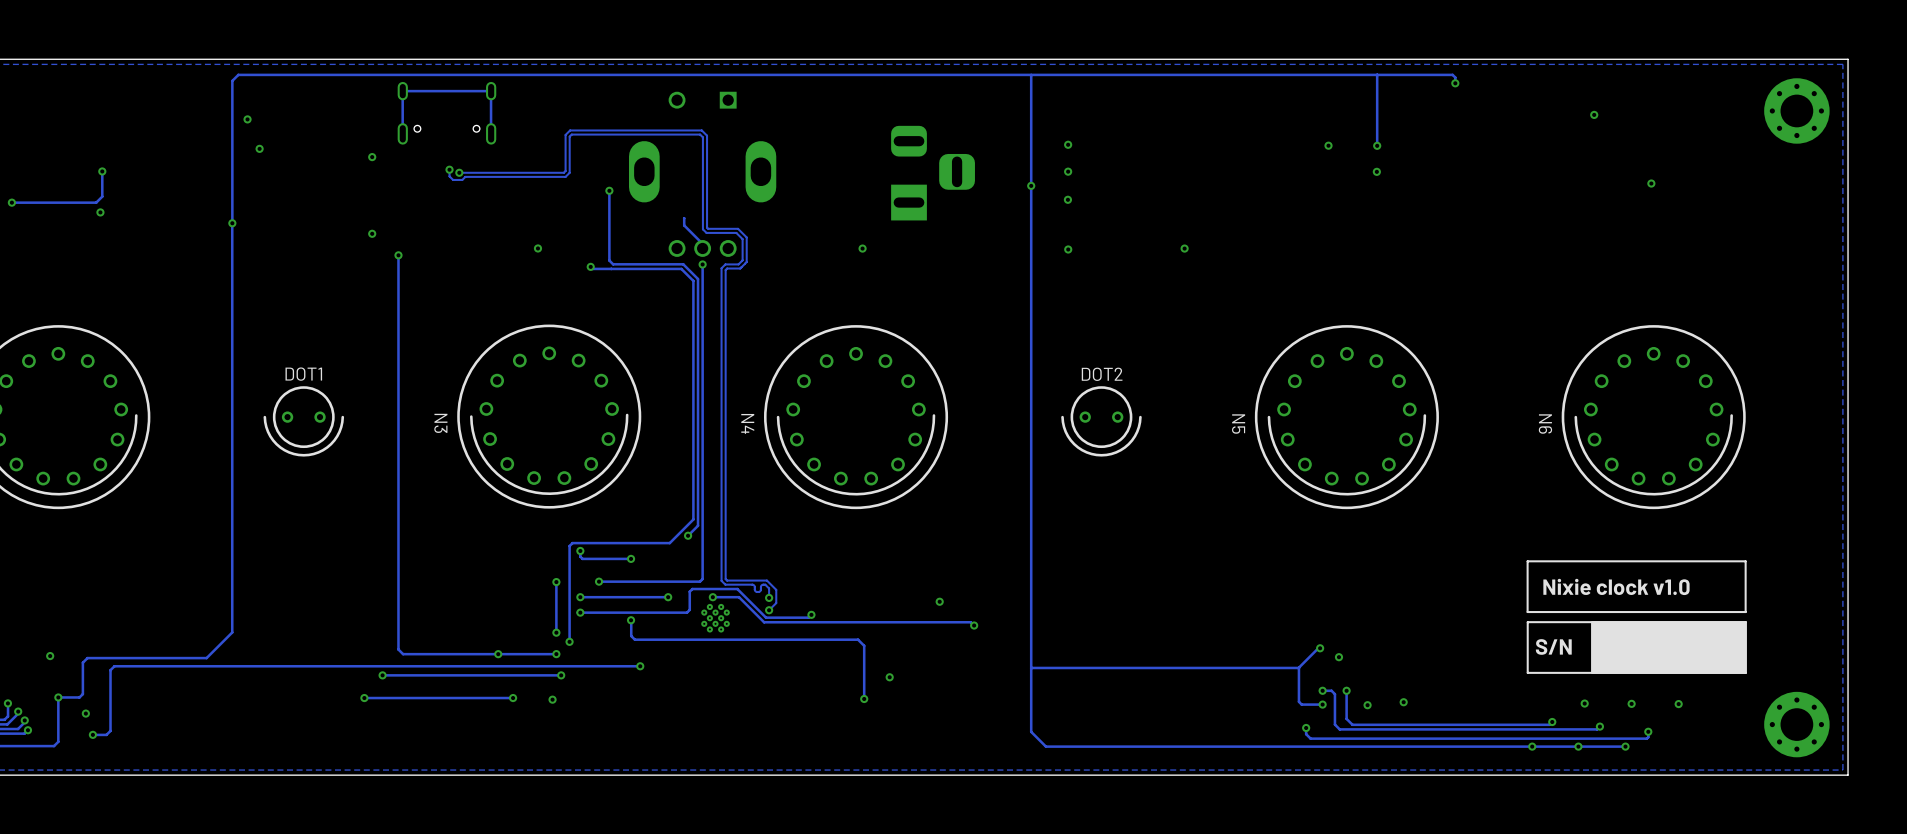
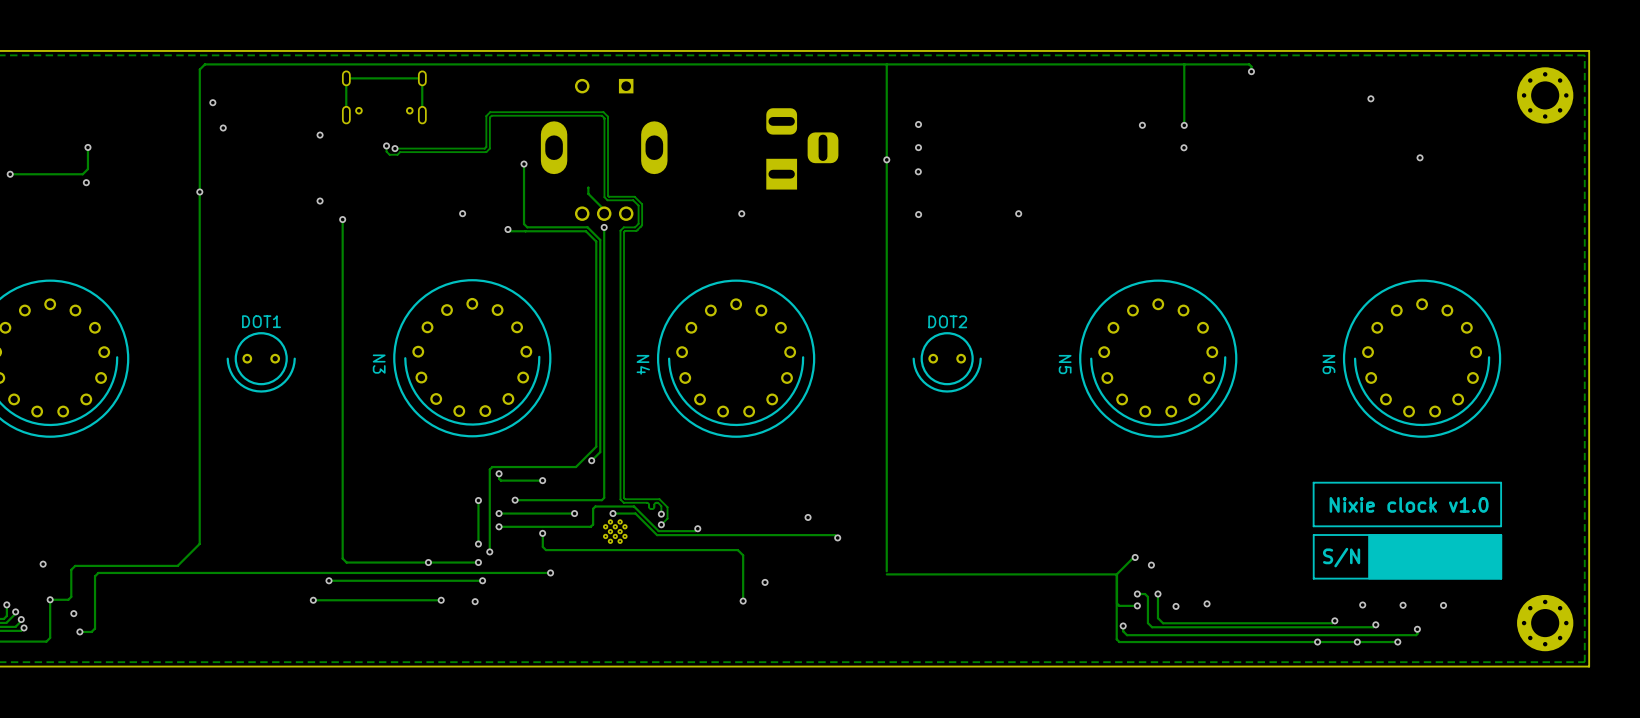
track: (1031, 664) (1031, 731) (1045, 746) (1301, 746) -> (1116, 574) (1116, 639) (1119, 642)

